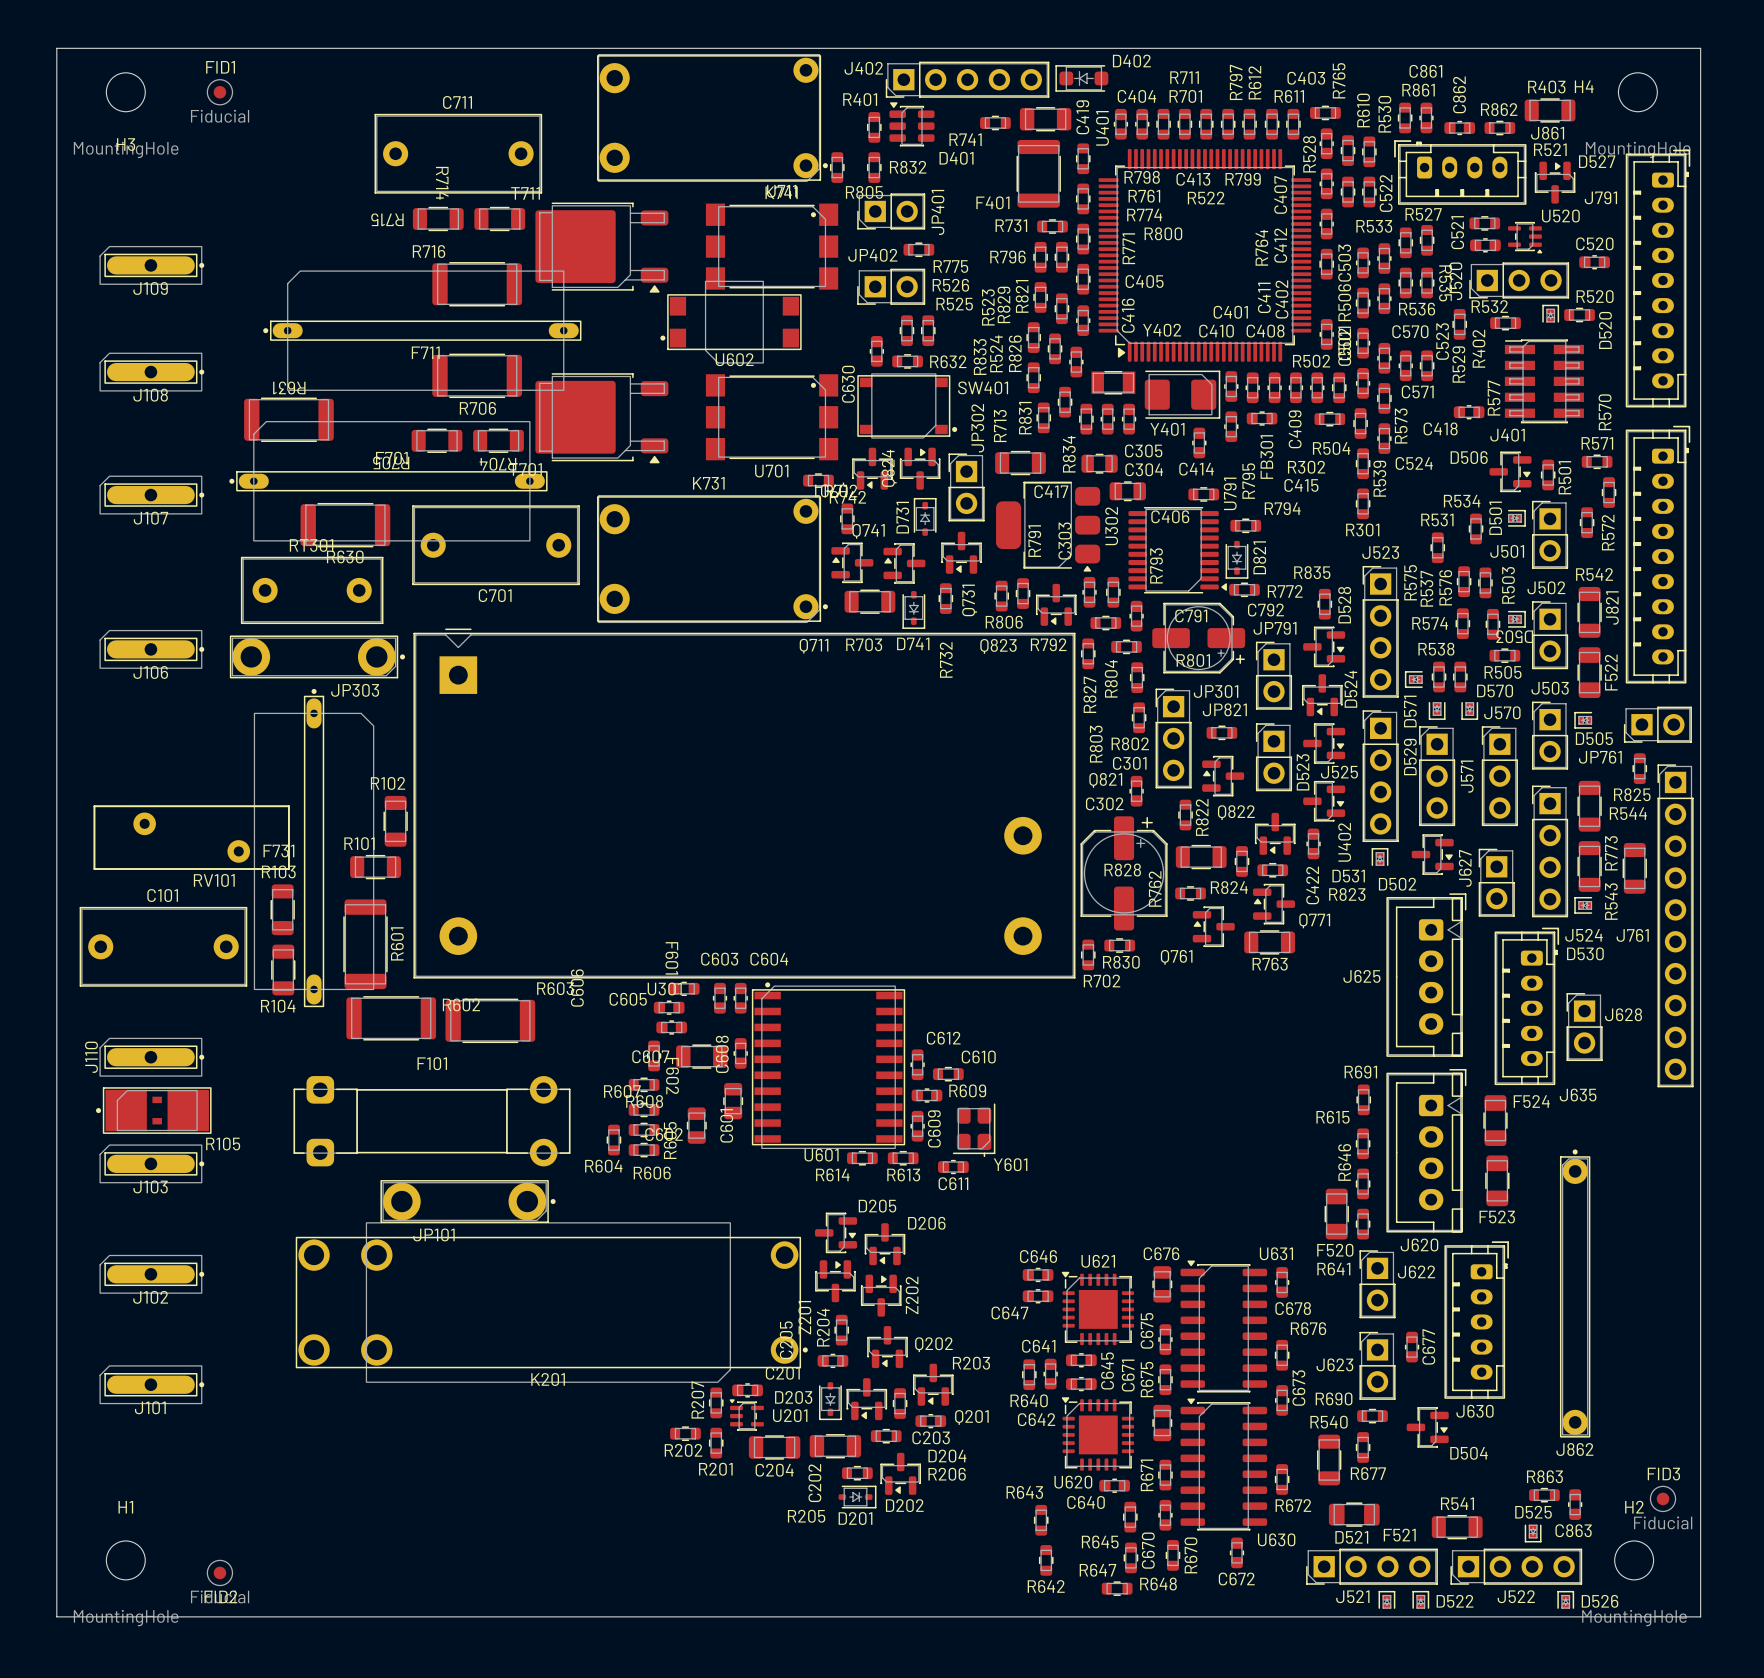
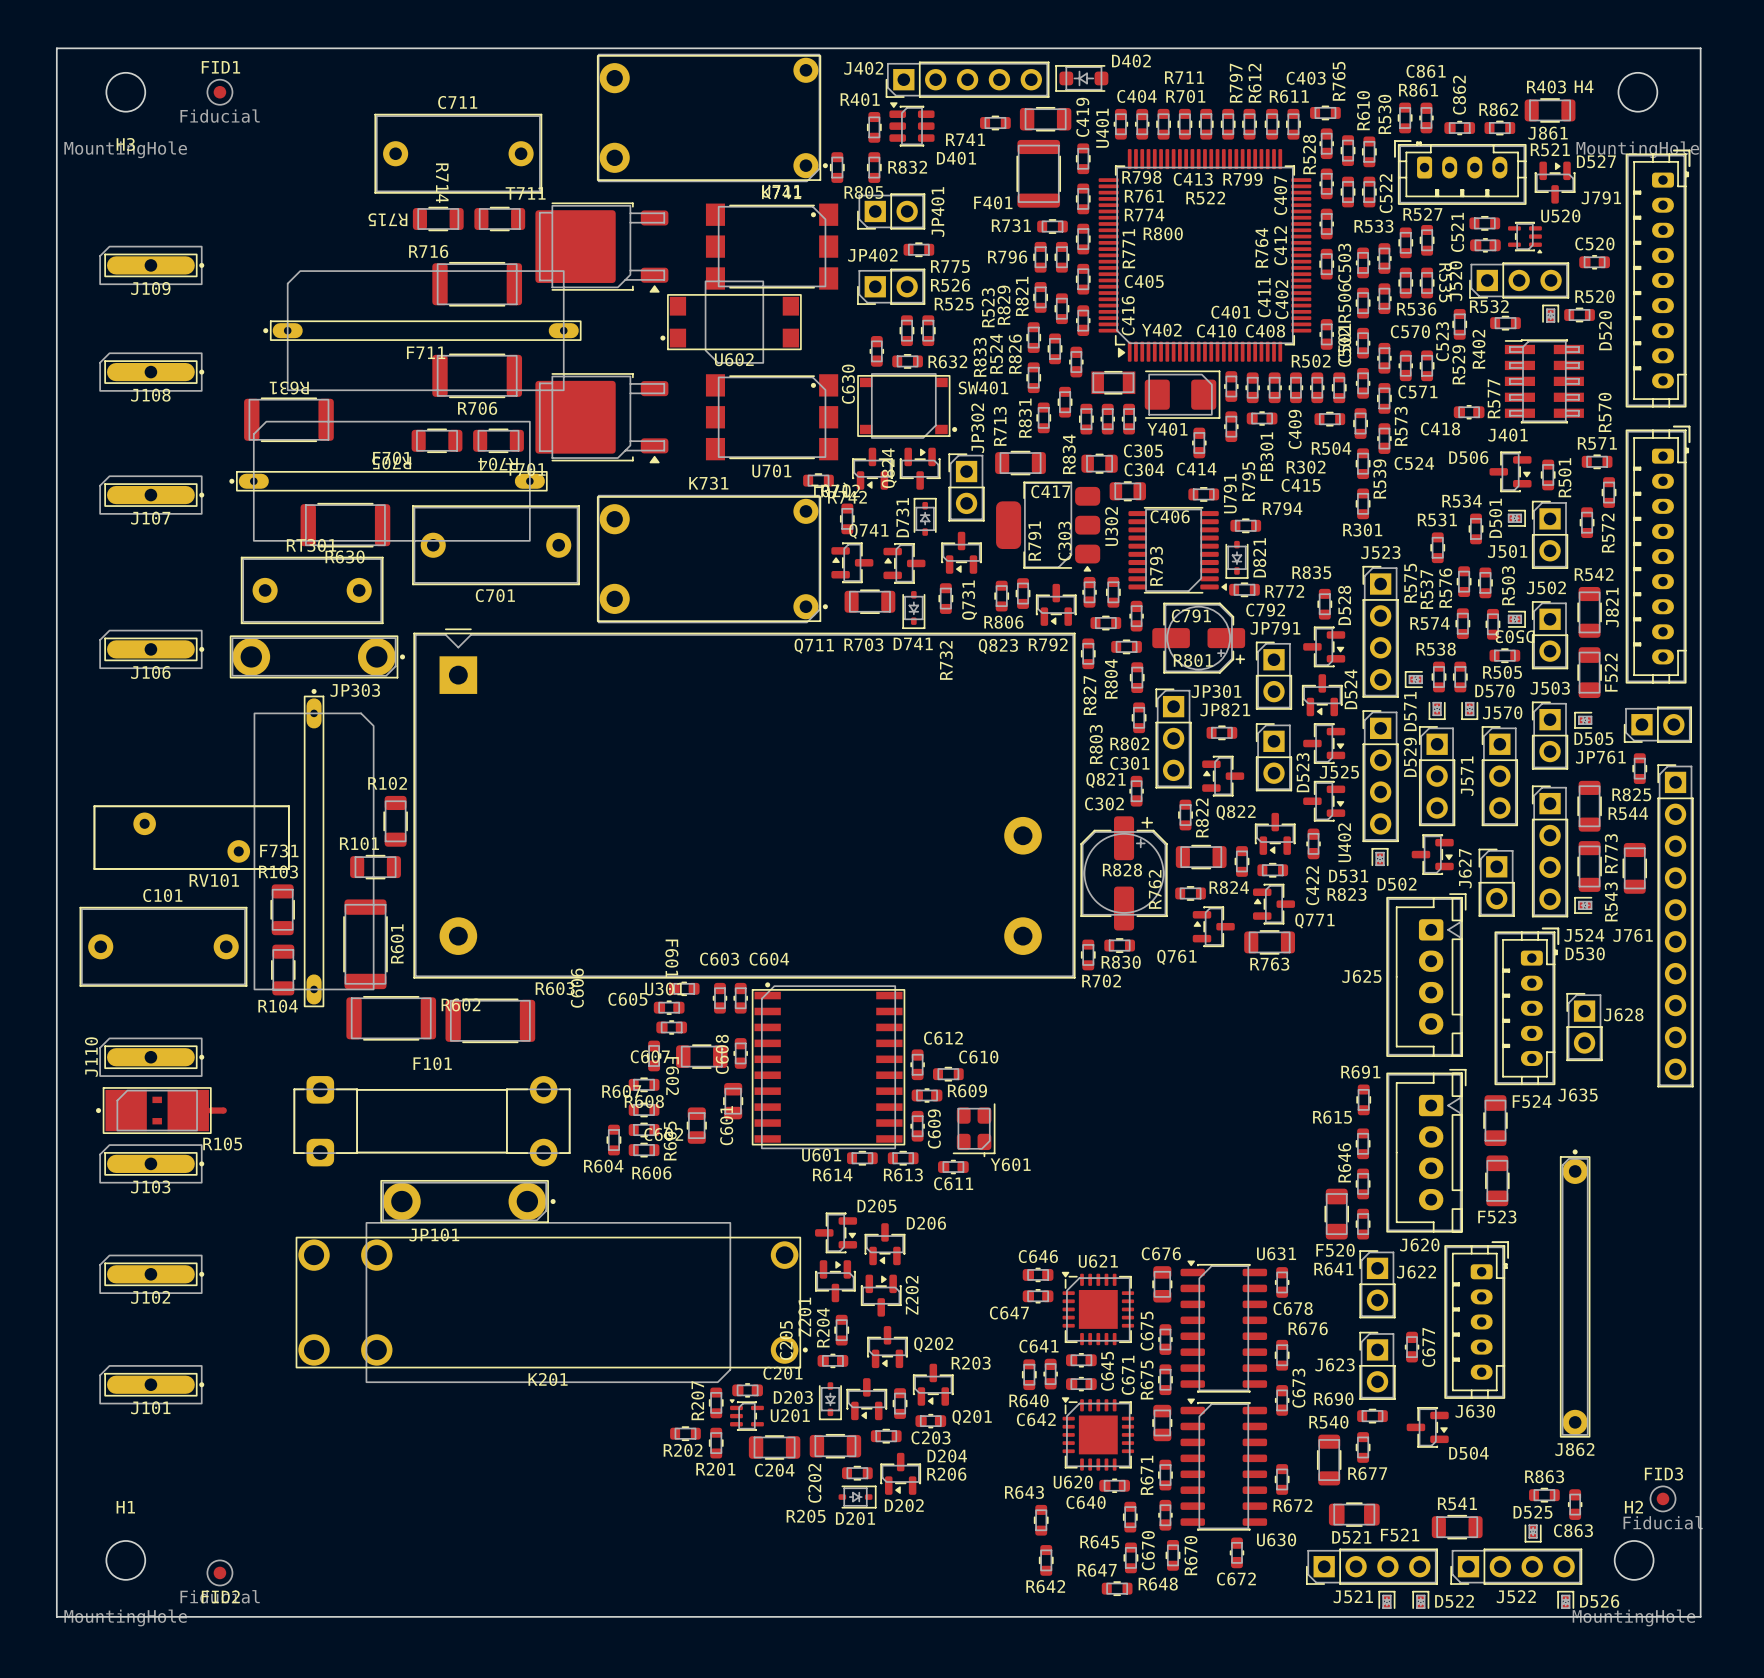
part: none -> (217, 1110)

